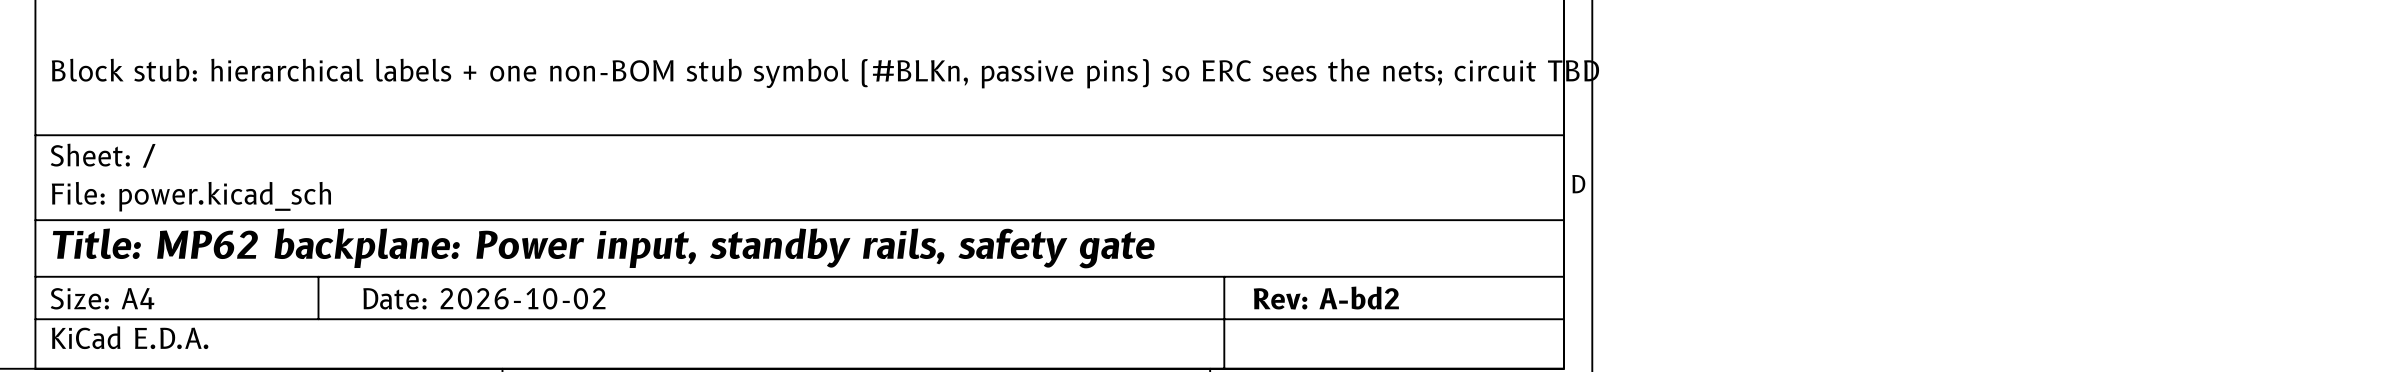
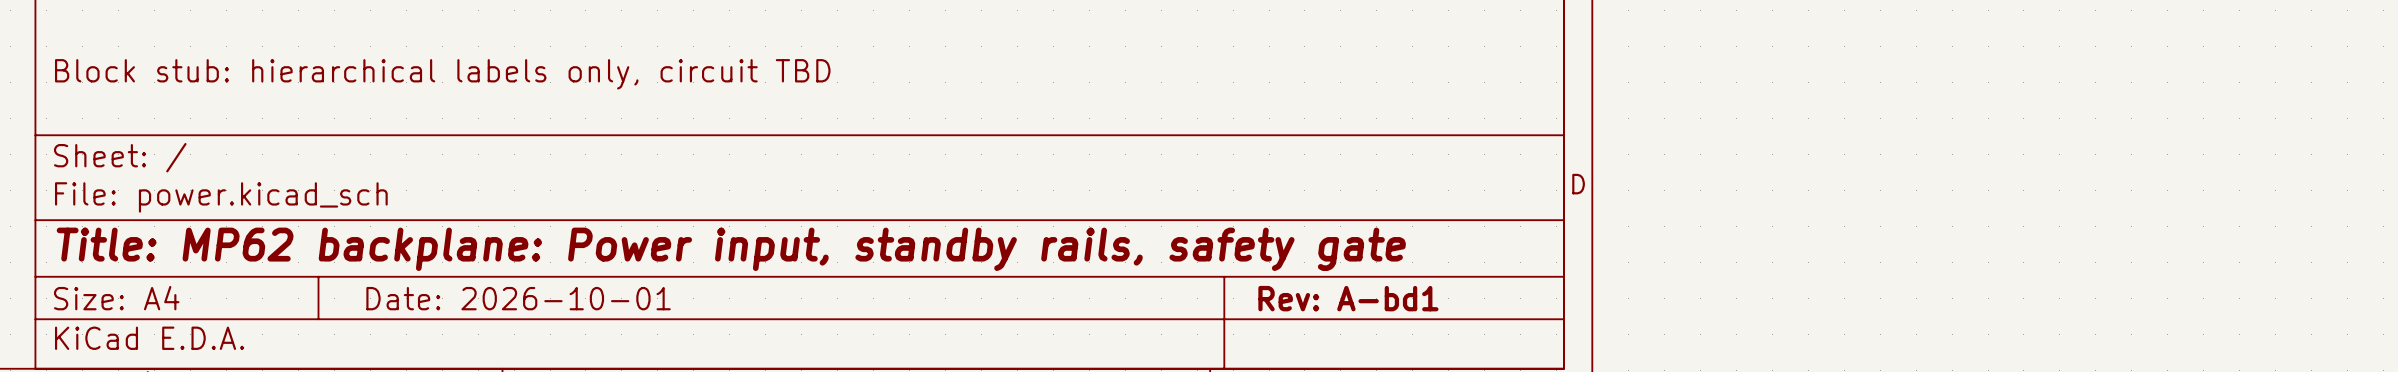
title block: Block stub: hierarchical labels + one non-BOM stub symbol (#BLKn, passive pins) so ERC sees the nets; circuit TBD (825, 73) -> Block stub: hierarchical labels only, circuit TBD (442, 74)
title block: Date: 2026-10-02 (484, 298) -> Date: 2026-10-01 (518, 298)
title block: Rev: A-bd2 (1326, 298) -> Rev: A-bd1 (1348, 298)

